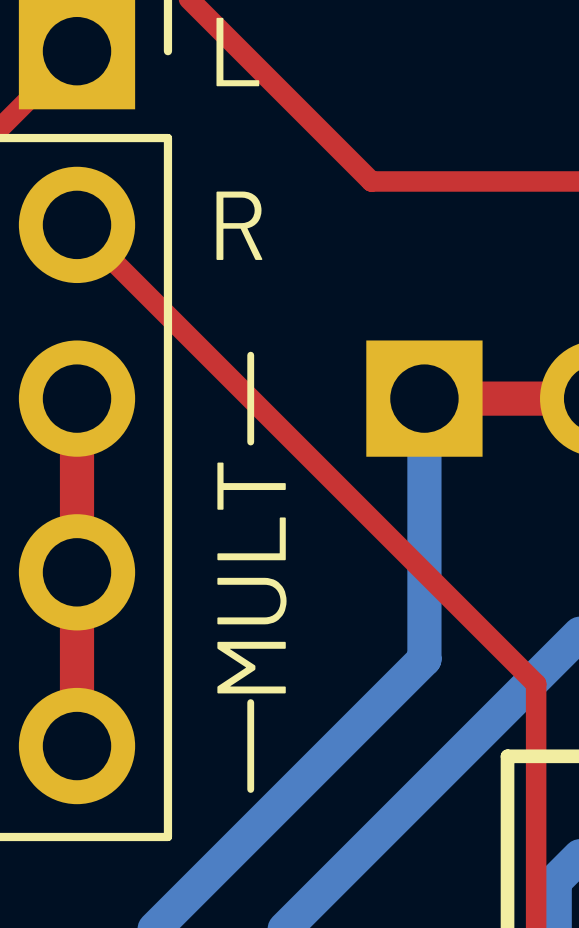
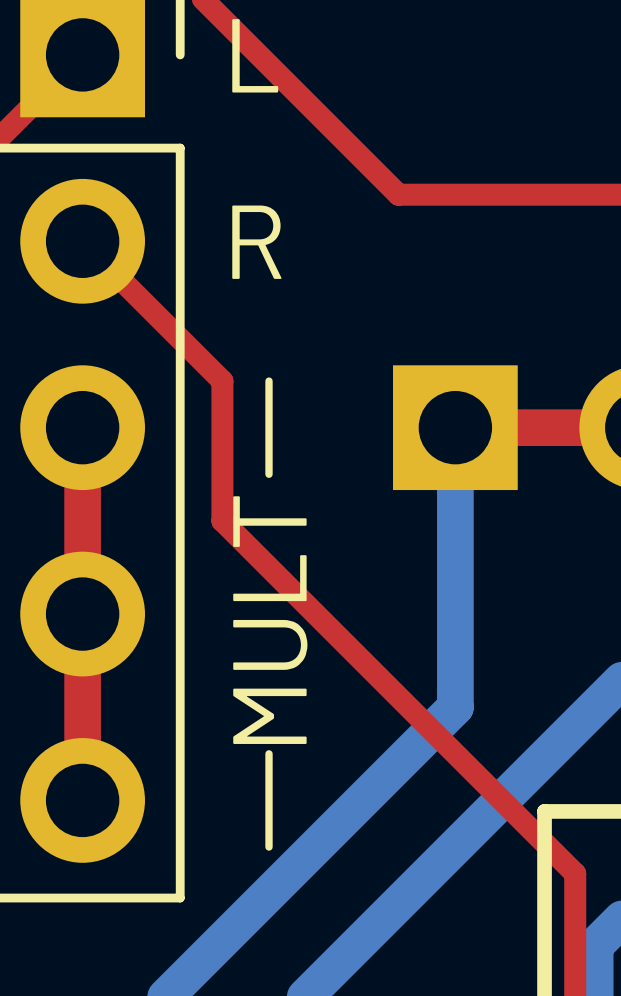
top track: (207, 355) (536, 684) (536, 814) -> (222, 381) (222, 520) (575, 873)

